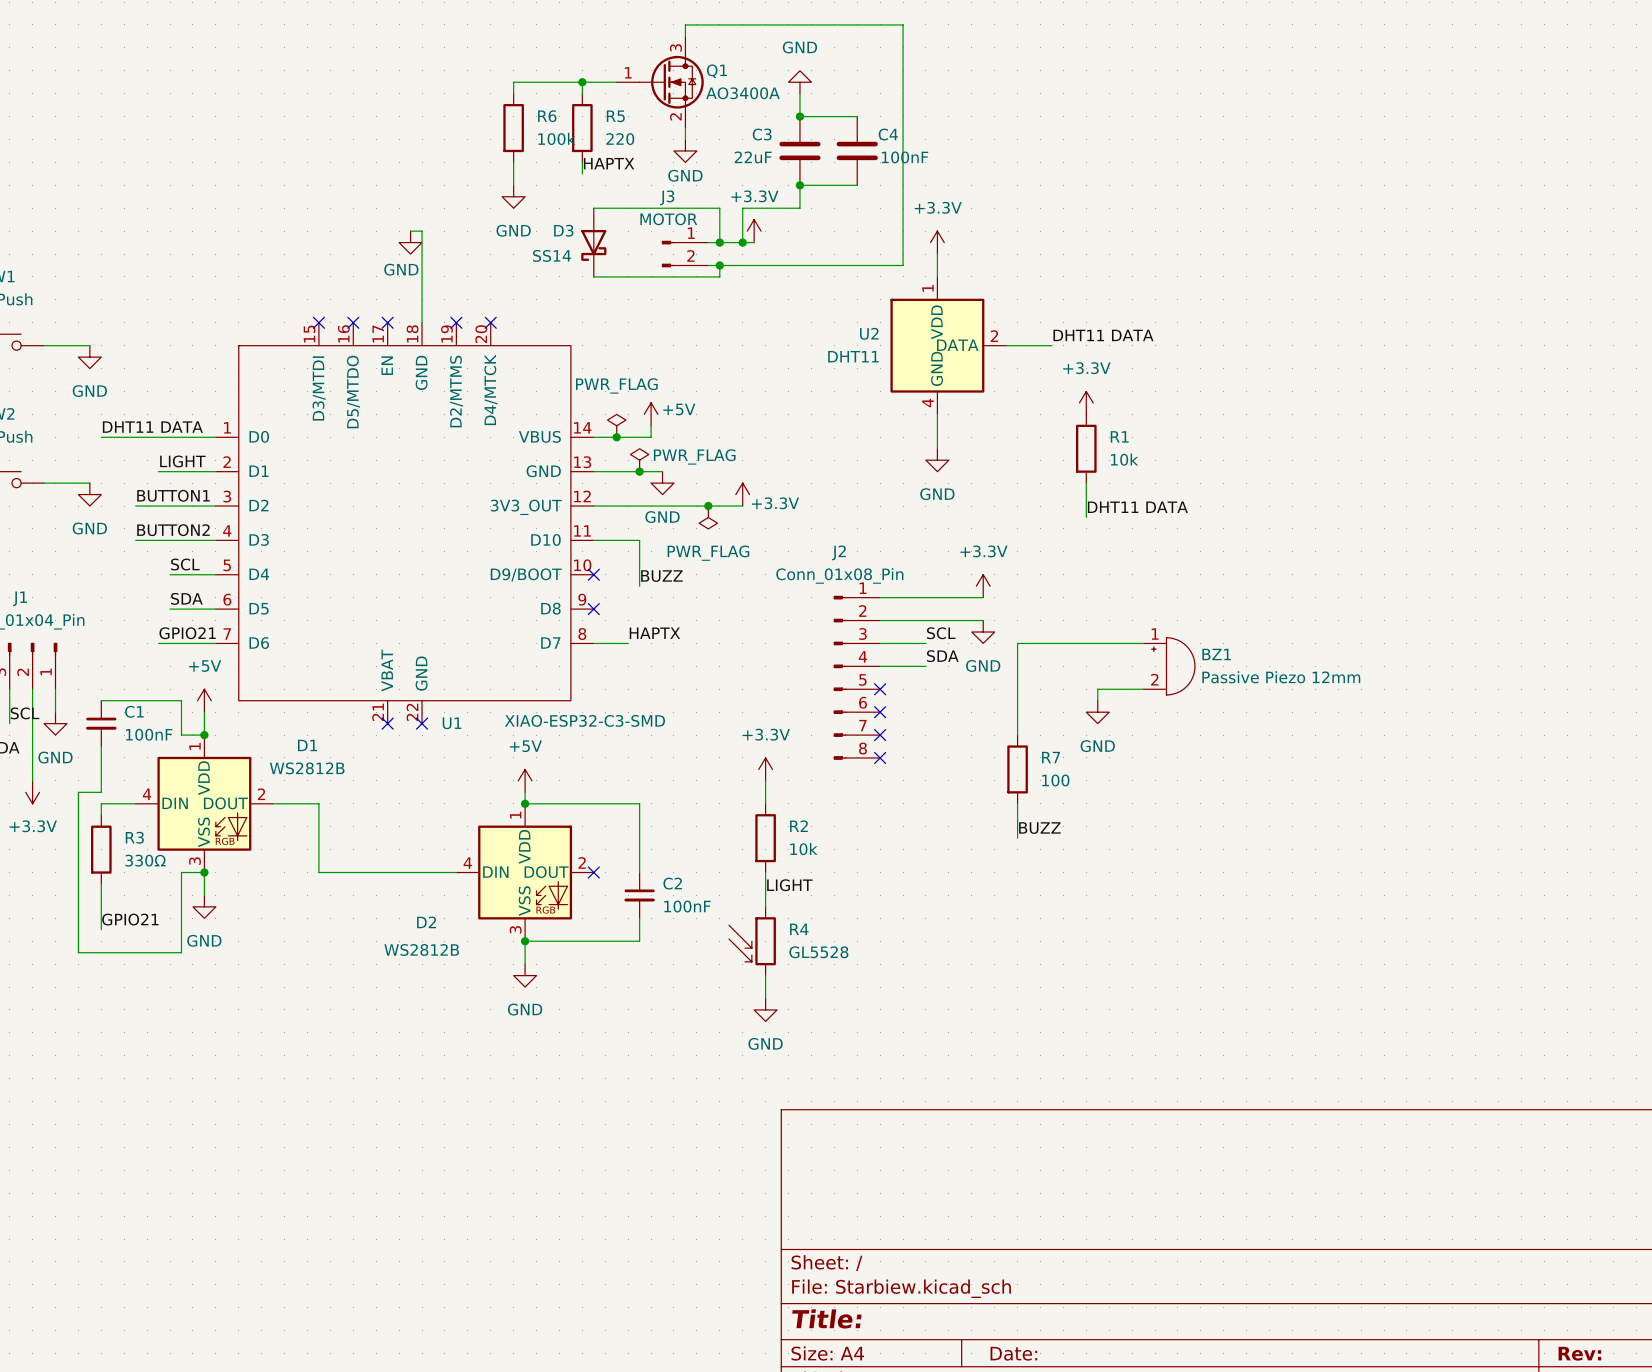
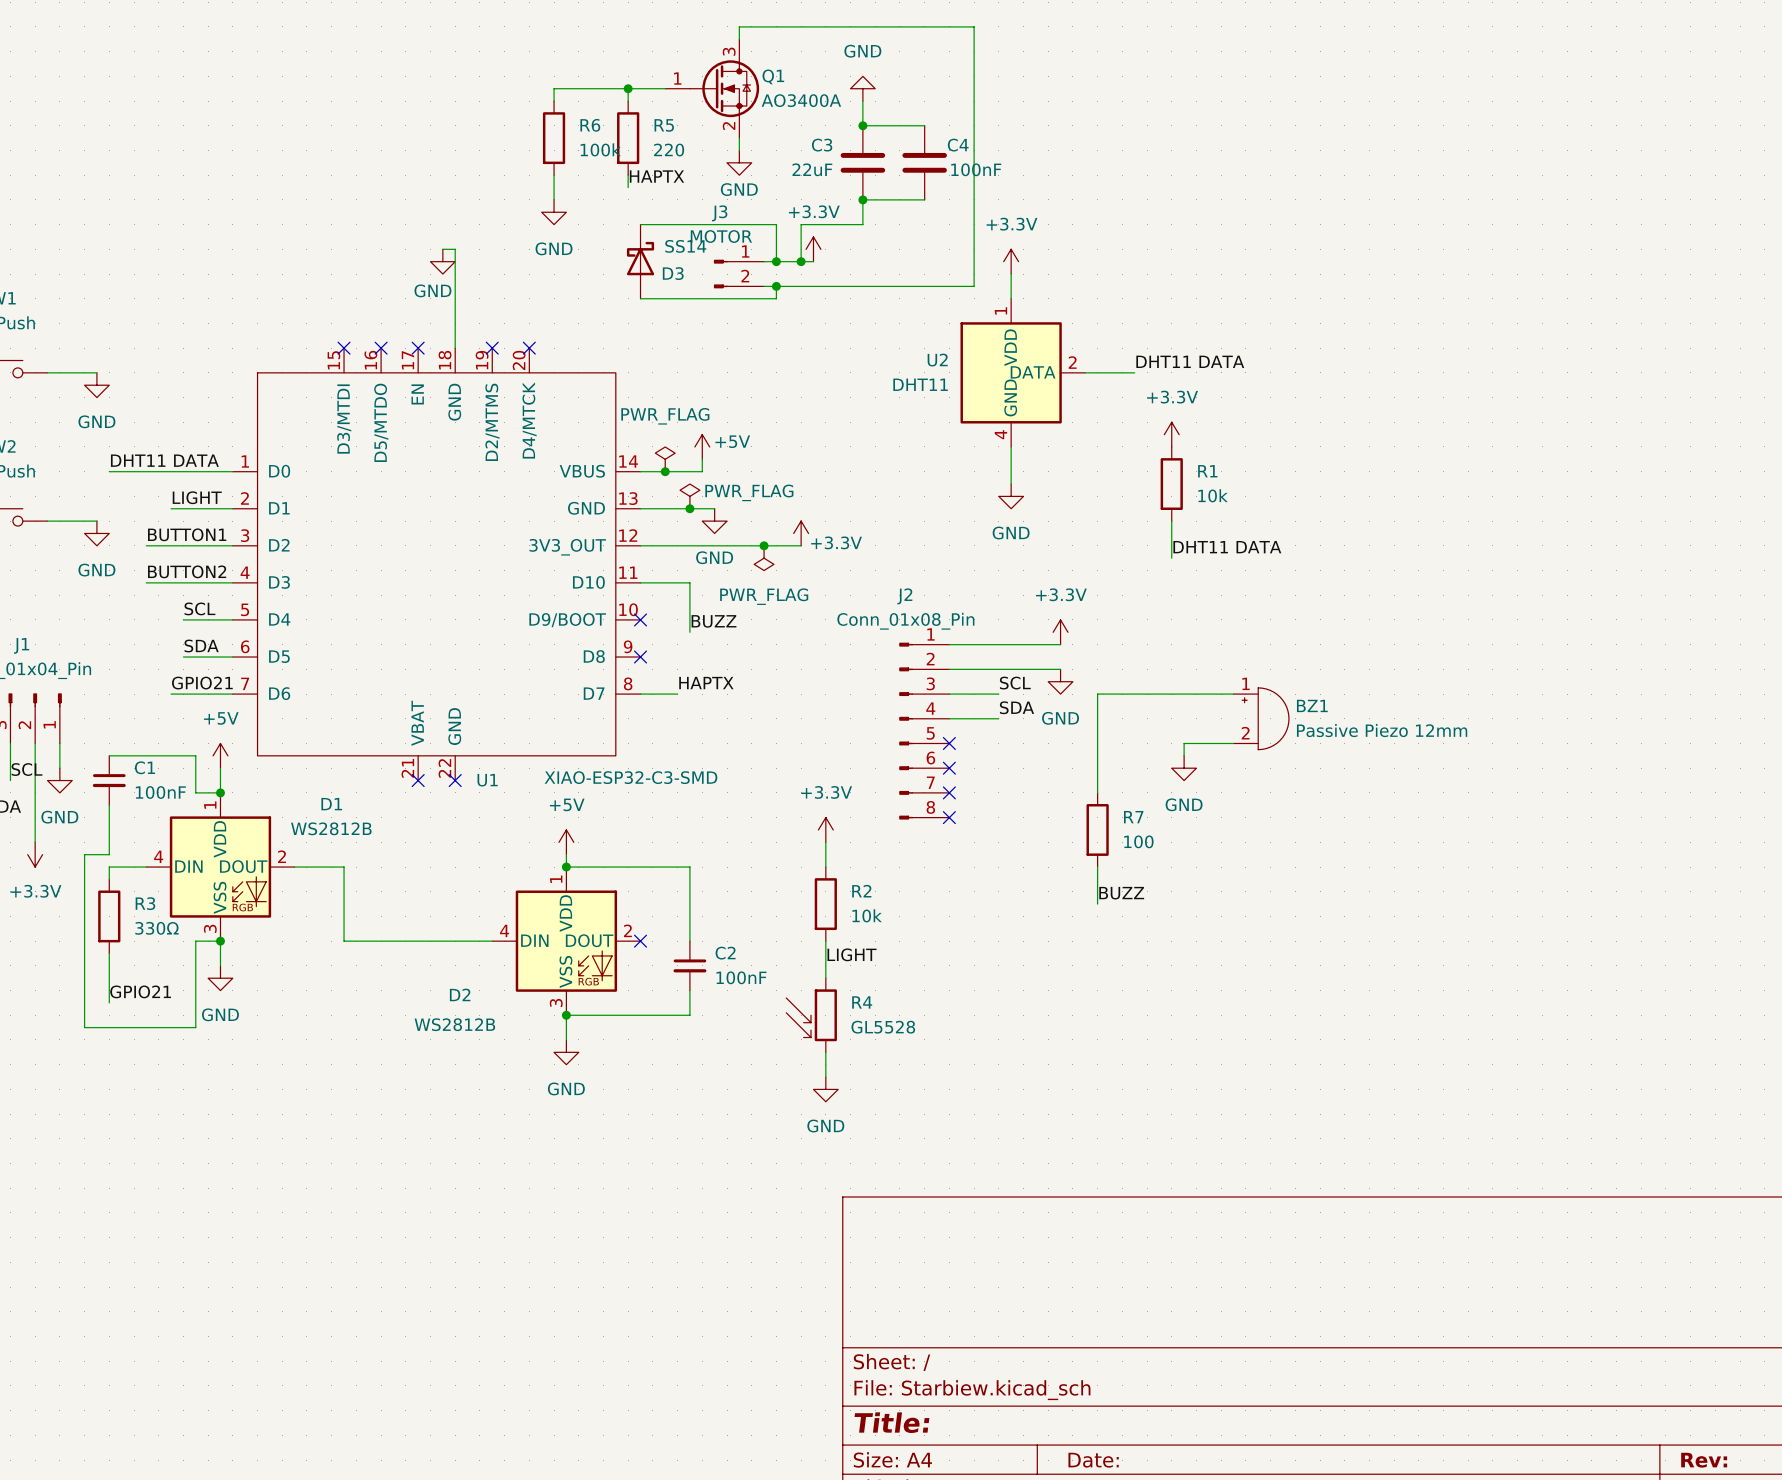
D3 rotation: 0° (593, 245) -> 180° (640, 258)

